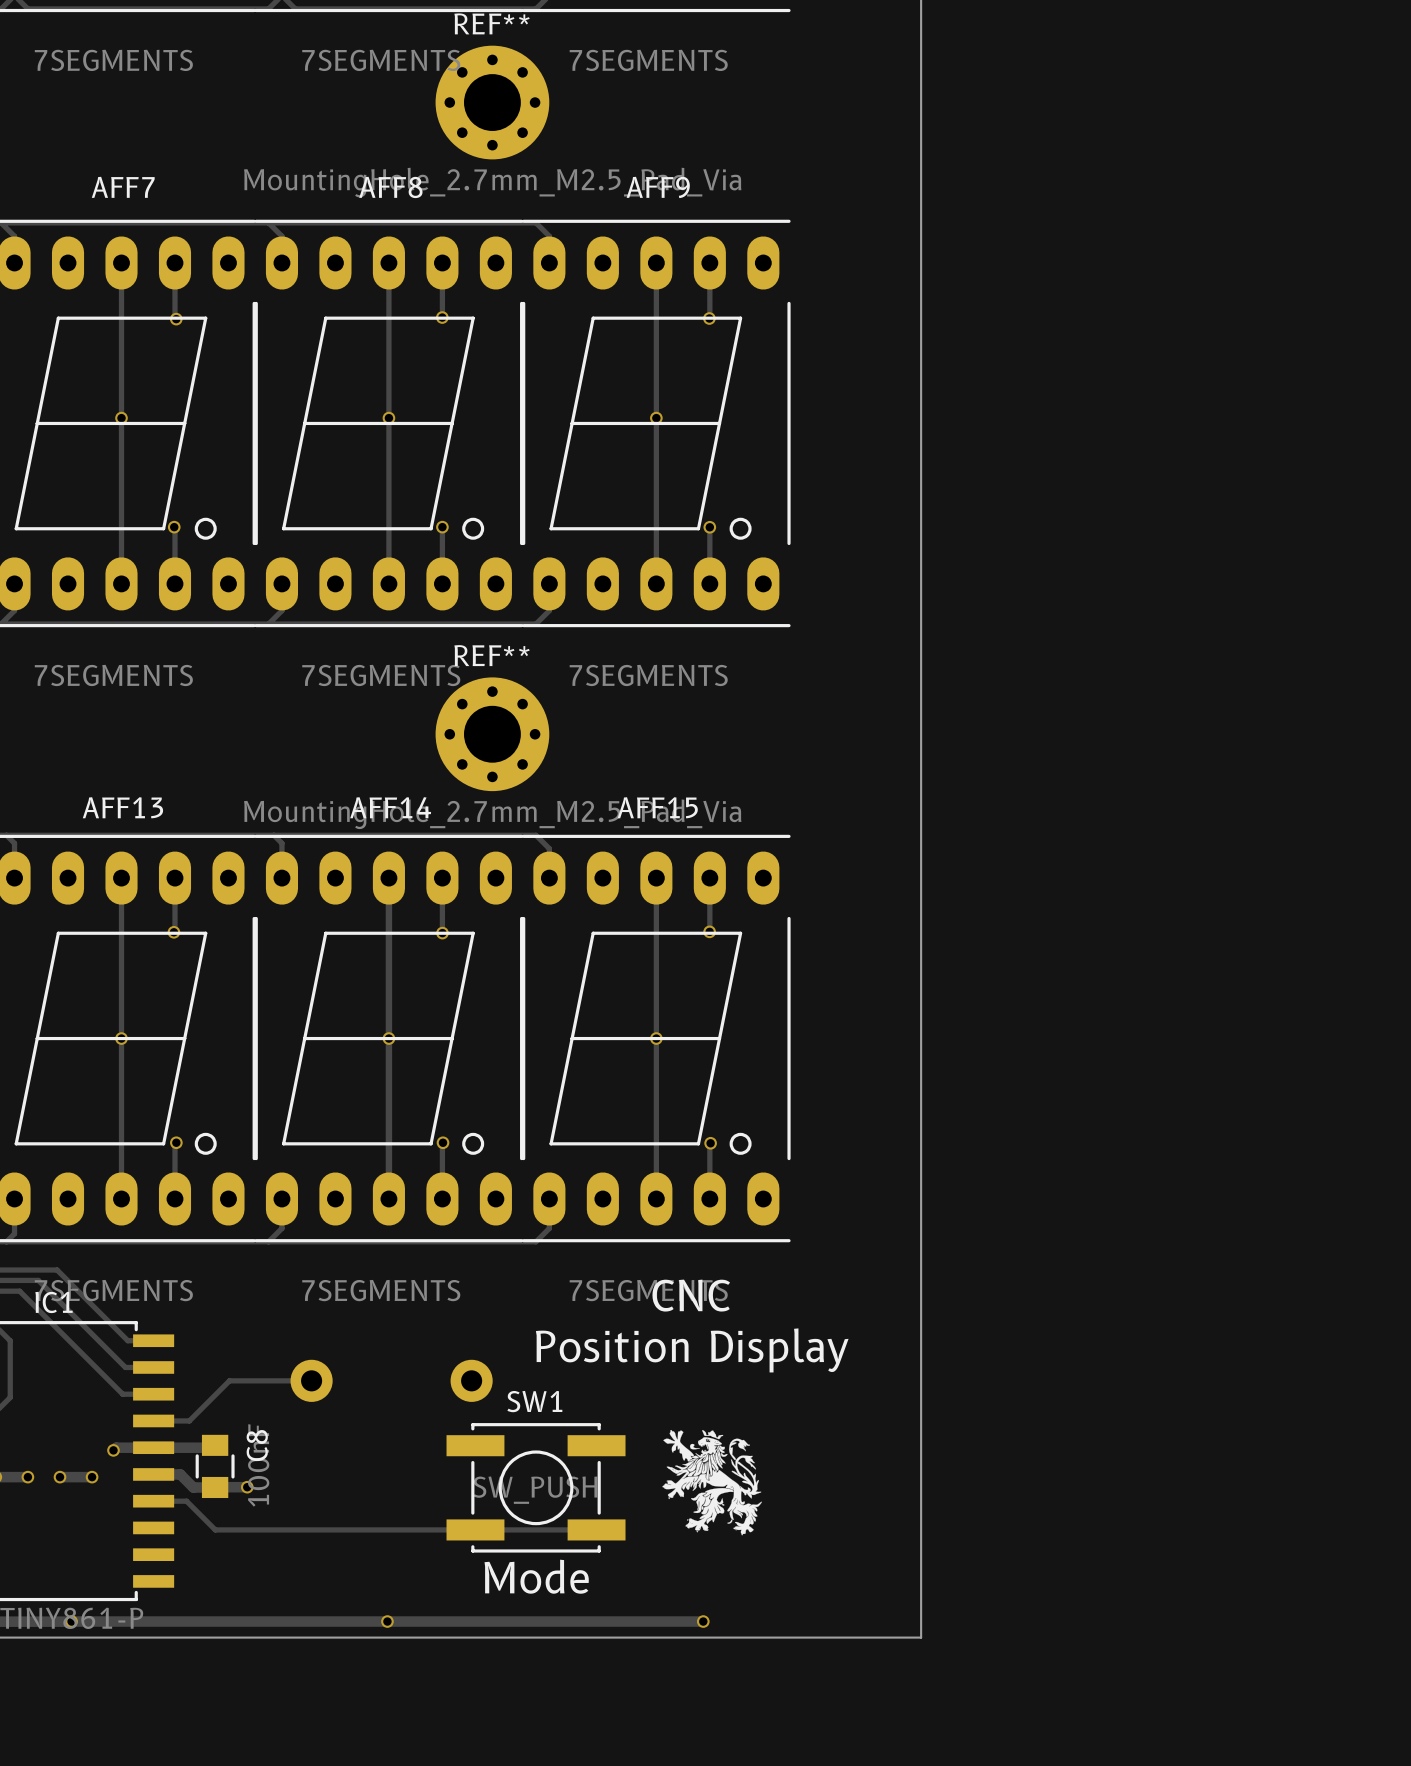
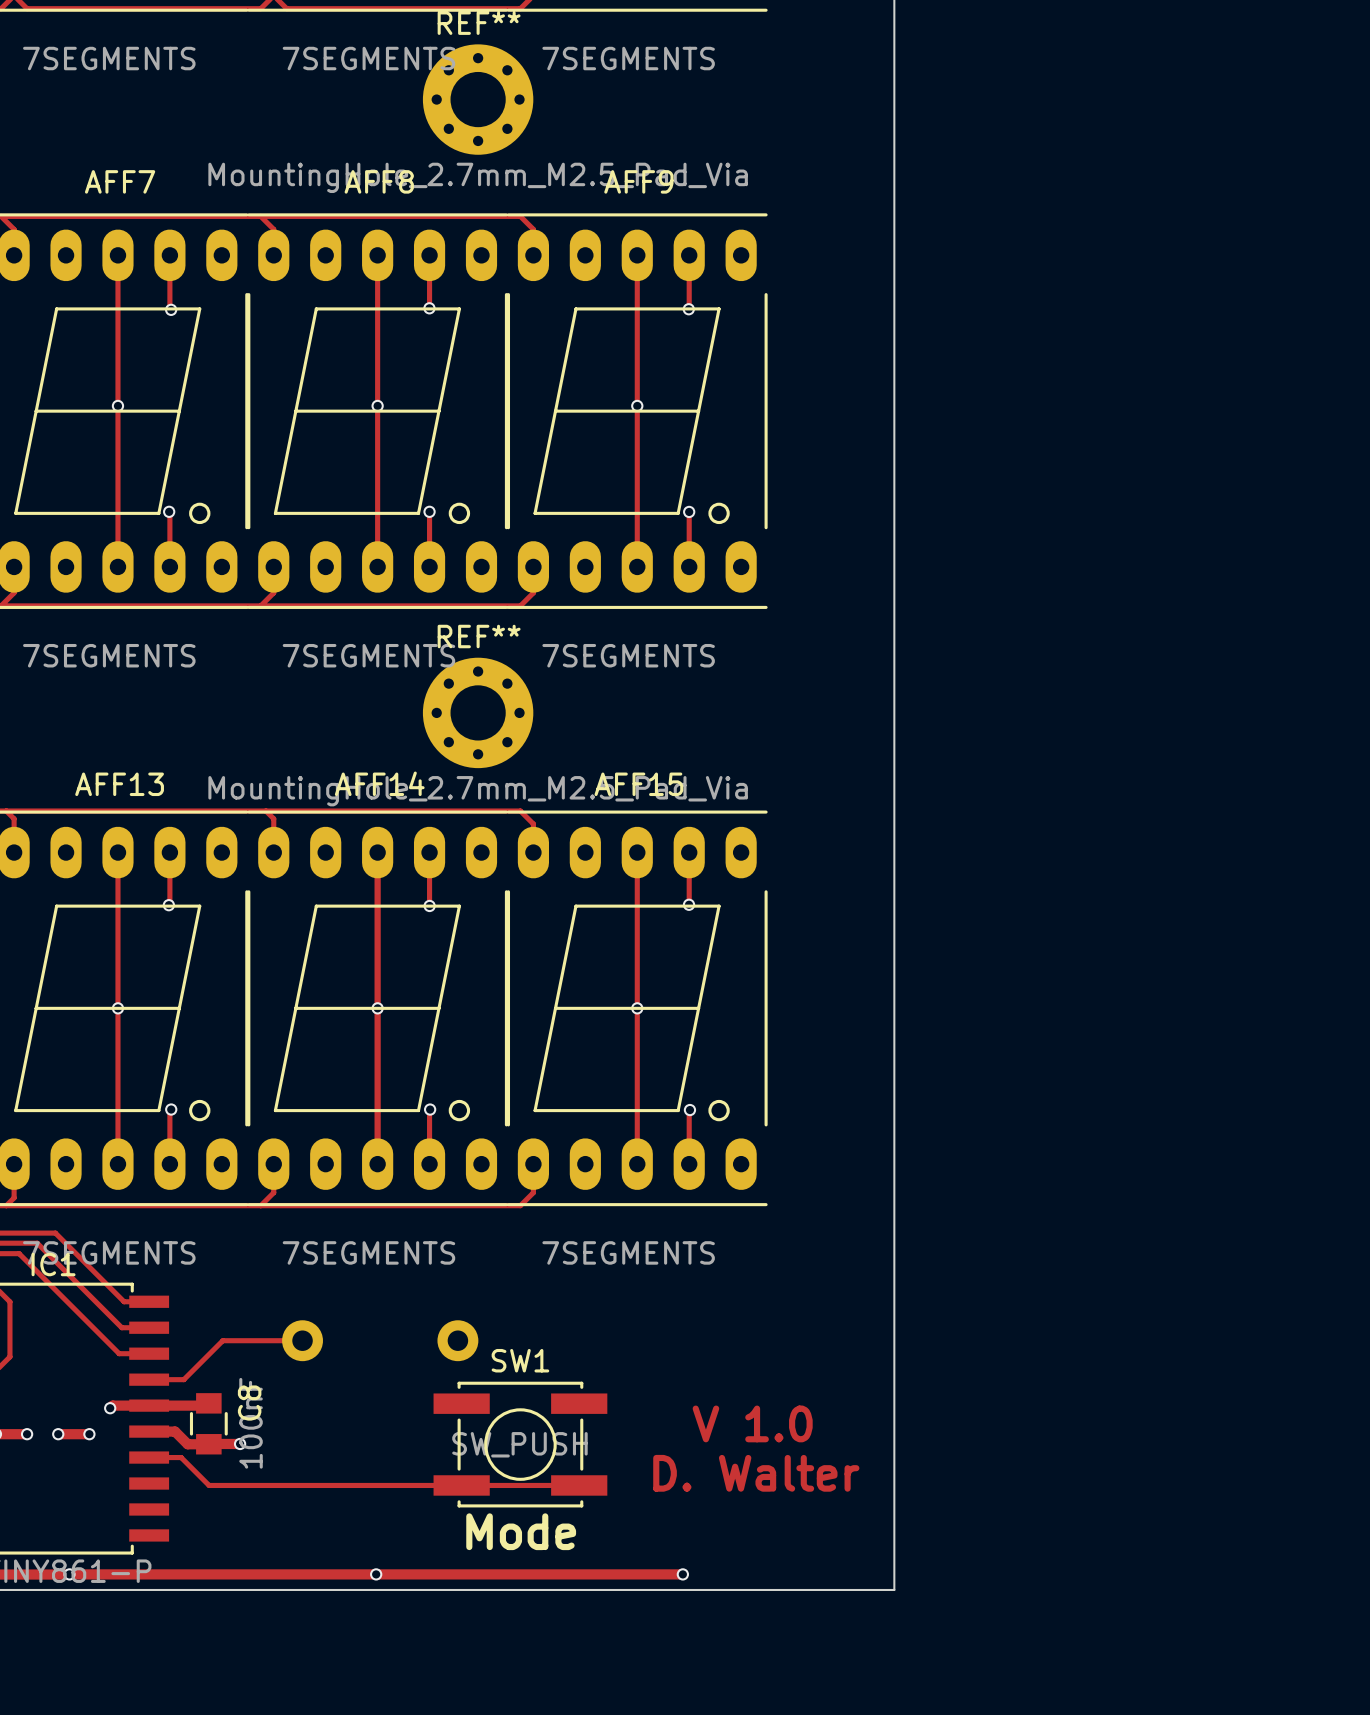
text: CNC (691, 1295) -> none
text: Position Display (692, 1350) -> none
drawing: [662, 1429, 762, 1536] -> none
text: none -> V 1.0 (752, 1423)
text: none -> D. Walter (756, 1473)

